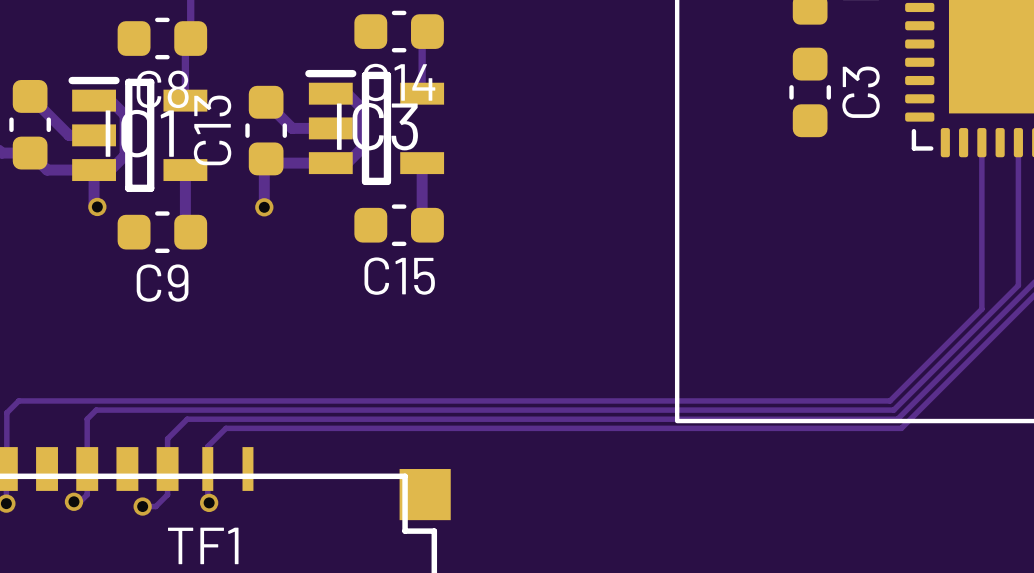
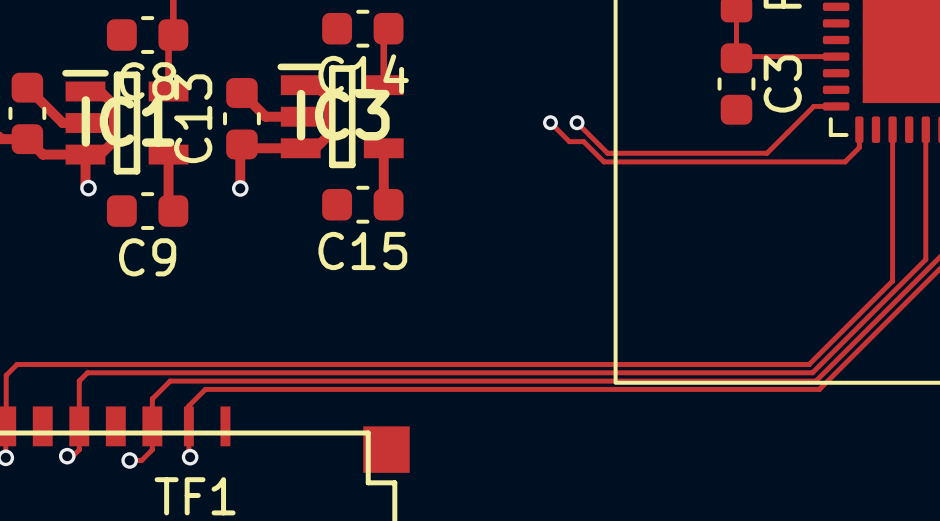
track: none -> (736, 9) (736, 58) (738, 56) (836, 56)
track: none -> (836, 106) (813, 106) (767, 153) (607, 153) (577, 122)
track: none -> (550, 122) (569, 141) (583, 141) (603, 161) (845, 161) (859, 147) (859, 129)
via: none -> (550, 122)
via: none -> (577, 122)

